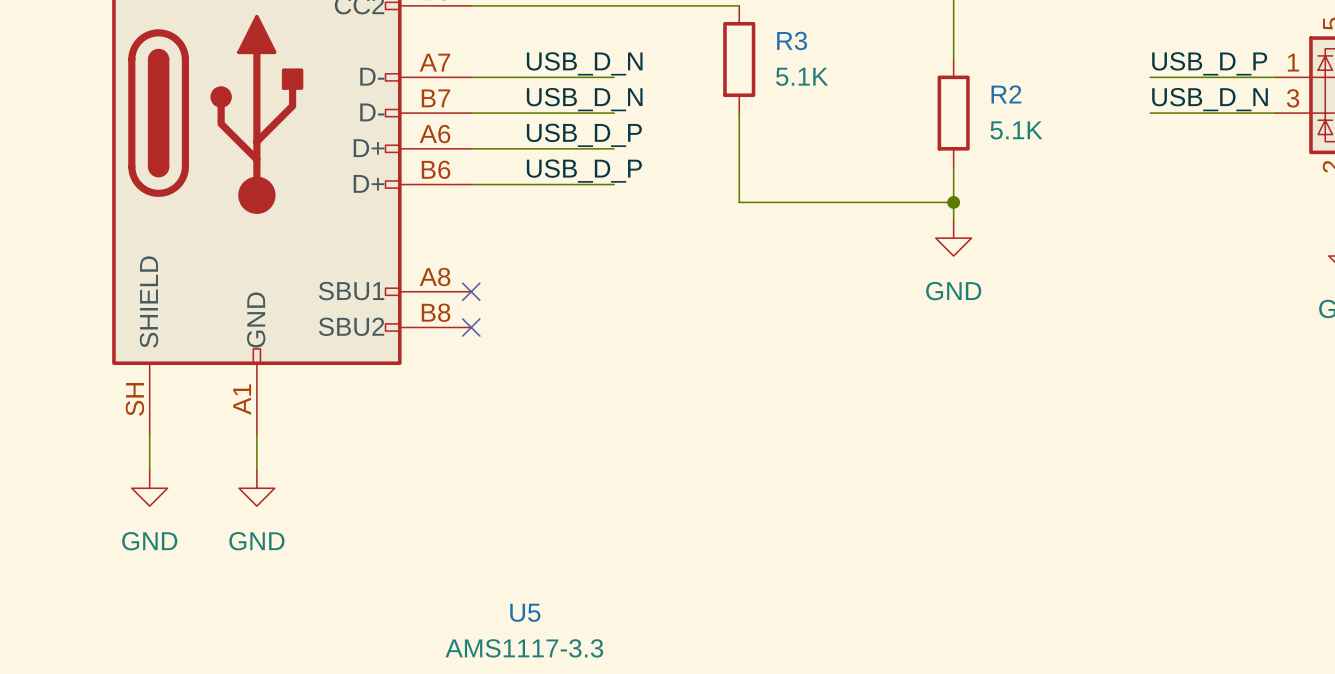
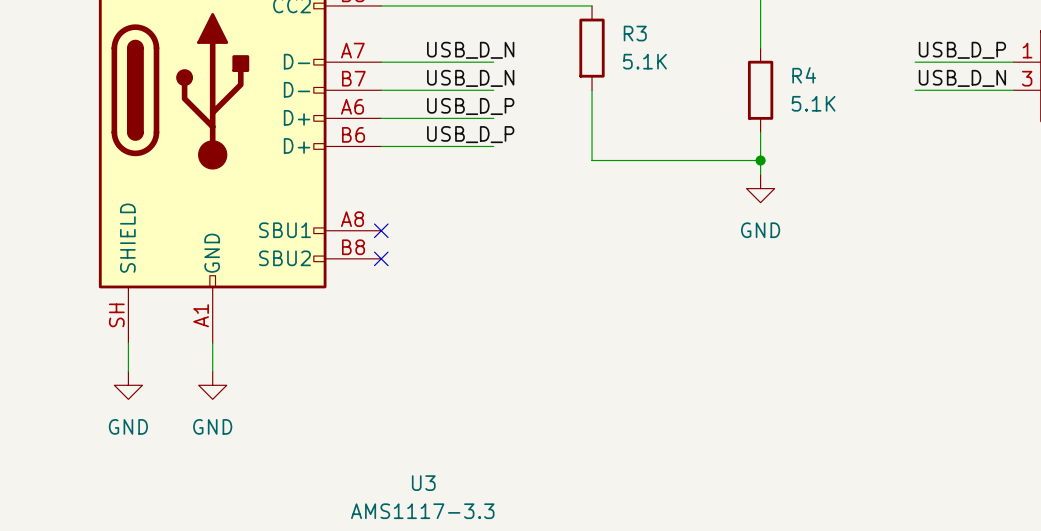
R2 name: R2 (1006, 94) -> R4 (804, 75)
U5 name: U5 (525, 612) -> U3 (423, 483)

